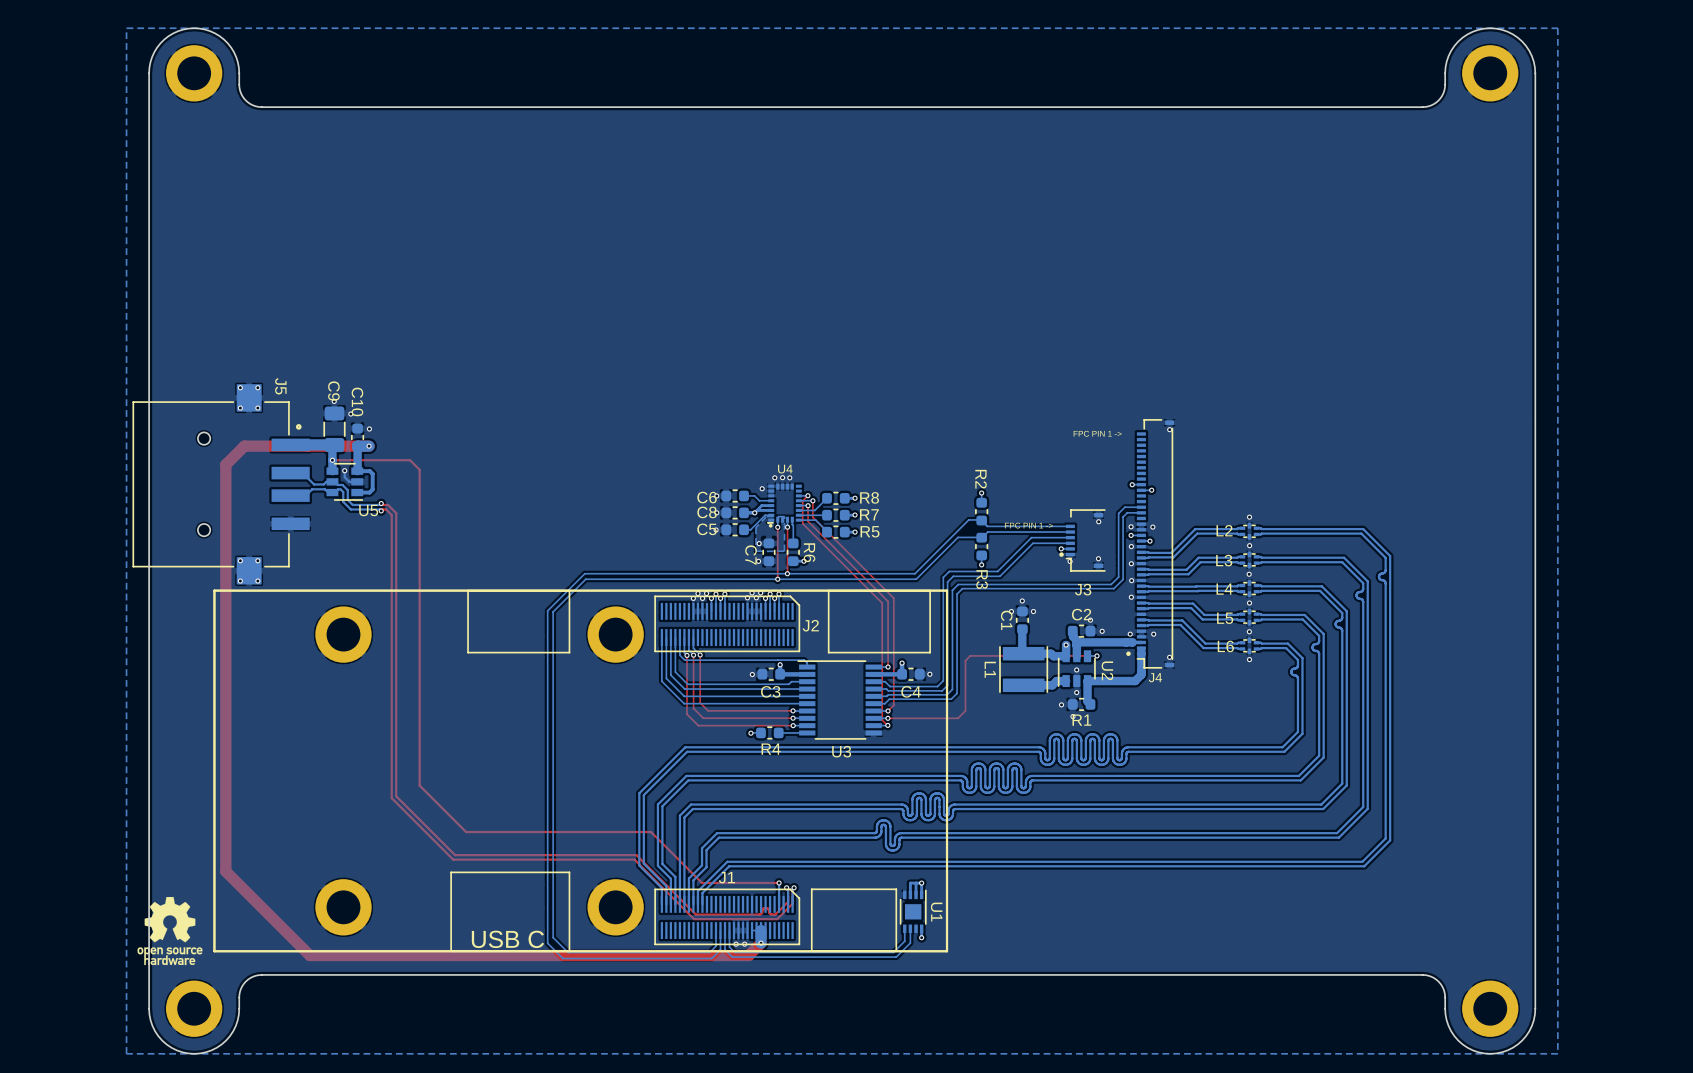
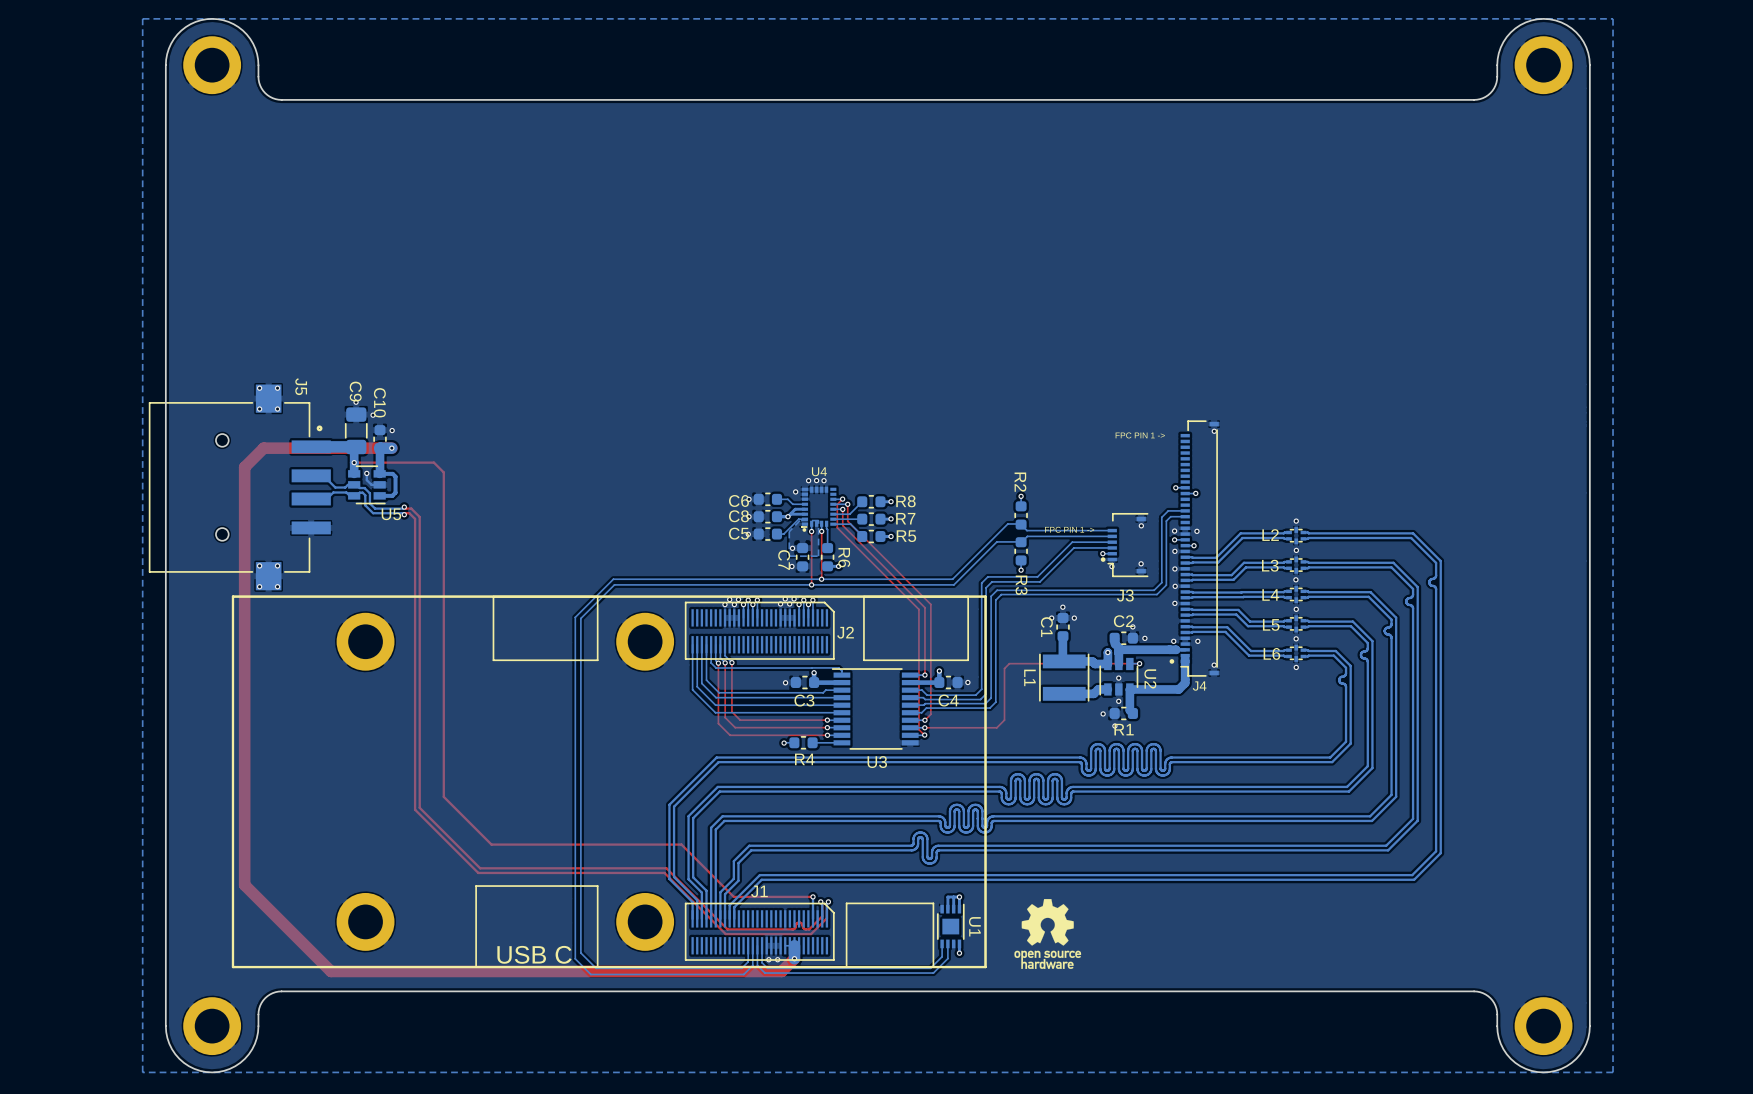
drawing: none -> [1014, 899, 1082, 969]
drawing: [137, 896, 203, 966] -> none

